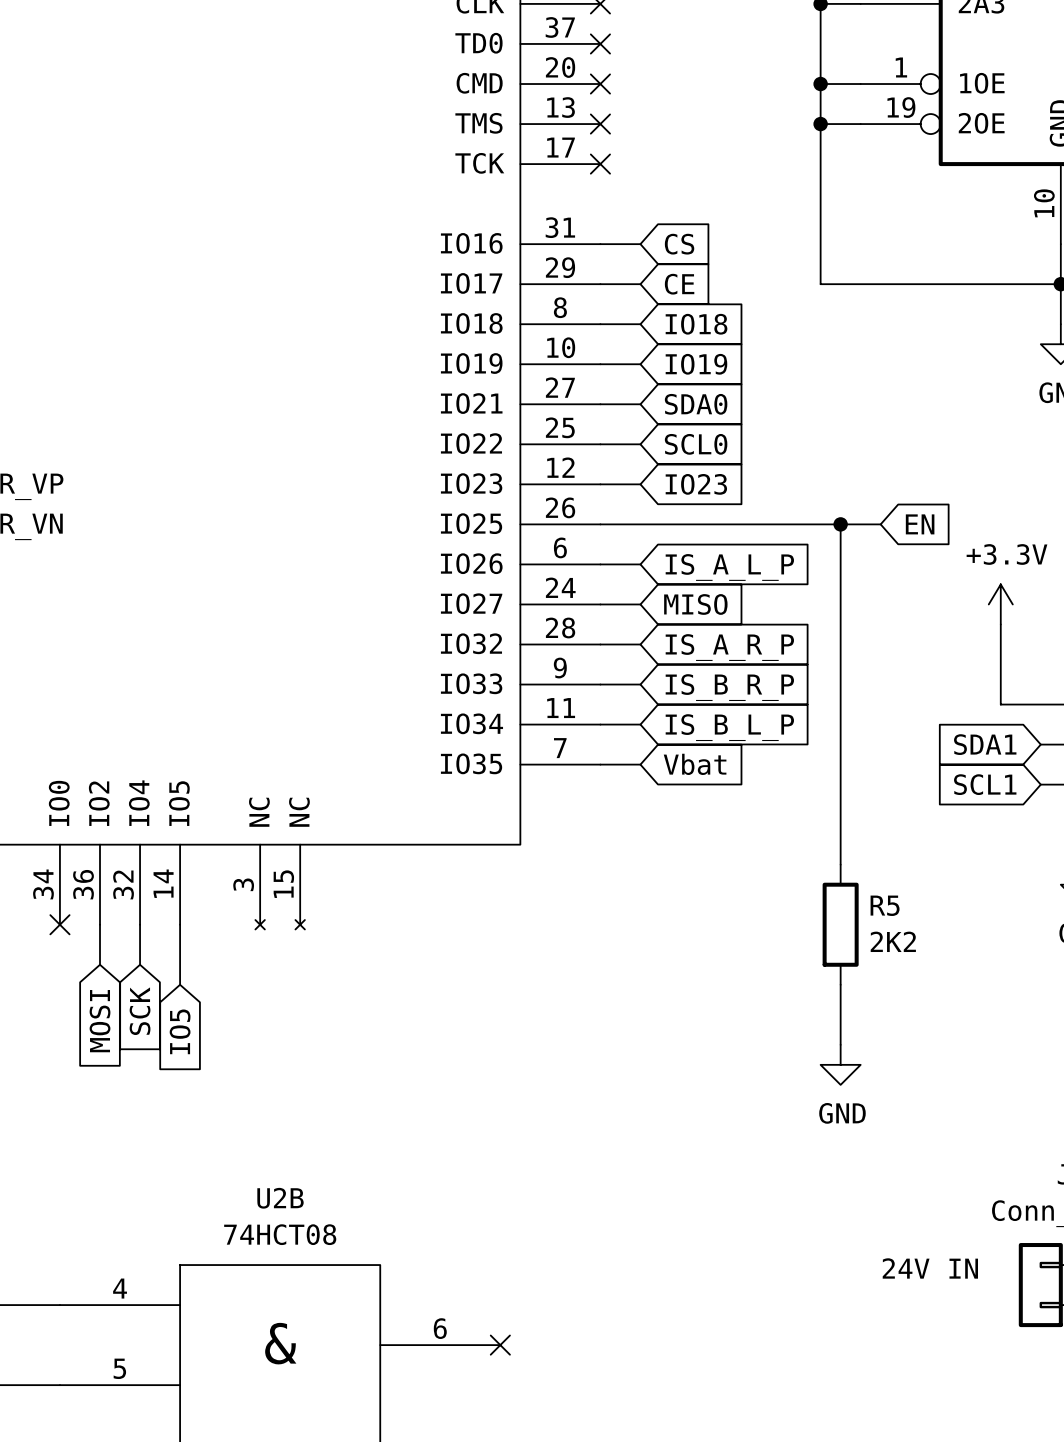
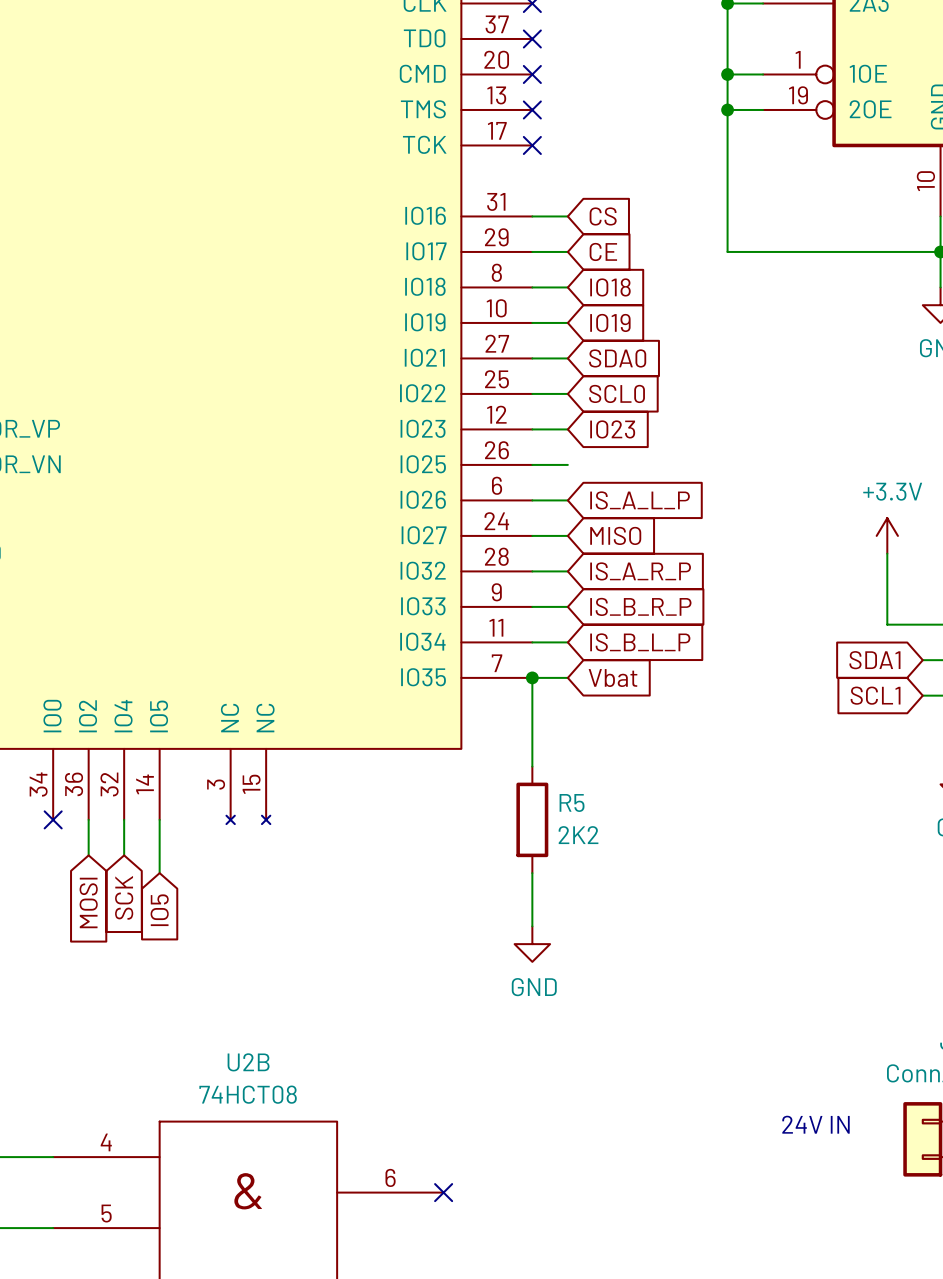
wire: (640, 524) (880, 524) -> none
wire: (840, 524) (840, 864) -> none
junction: (840, 524) -> none
global label: EN (920, 524) -> none
wire: none -> (532, 677) (532, 766)
junction: none -> (532, 677)
R5 position: (840, 924) -> (532, 819)
wire: (840, 984) (840, 1044) -> (532, 873) (532, 926)
power symbol position: GND (840, 1064) -> GND (532, 944)

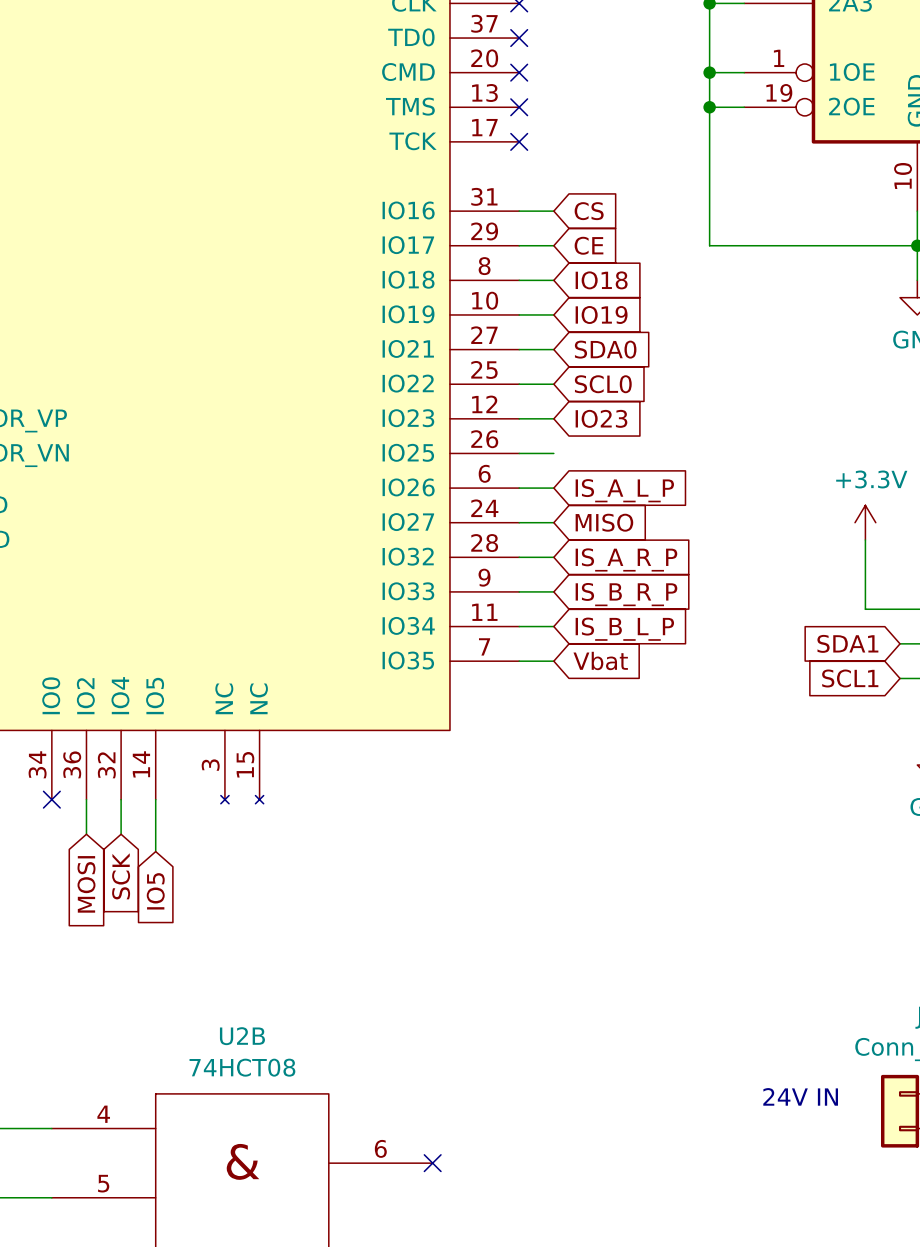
wire: (532, 677) (532, 766) -> none
junction: (532, 677) -> none
R5: 2K2 (532, 819) -> none
wire: (532, 873) (532, 926) -> none
power symbol: GND (532, 944) -> none

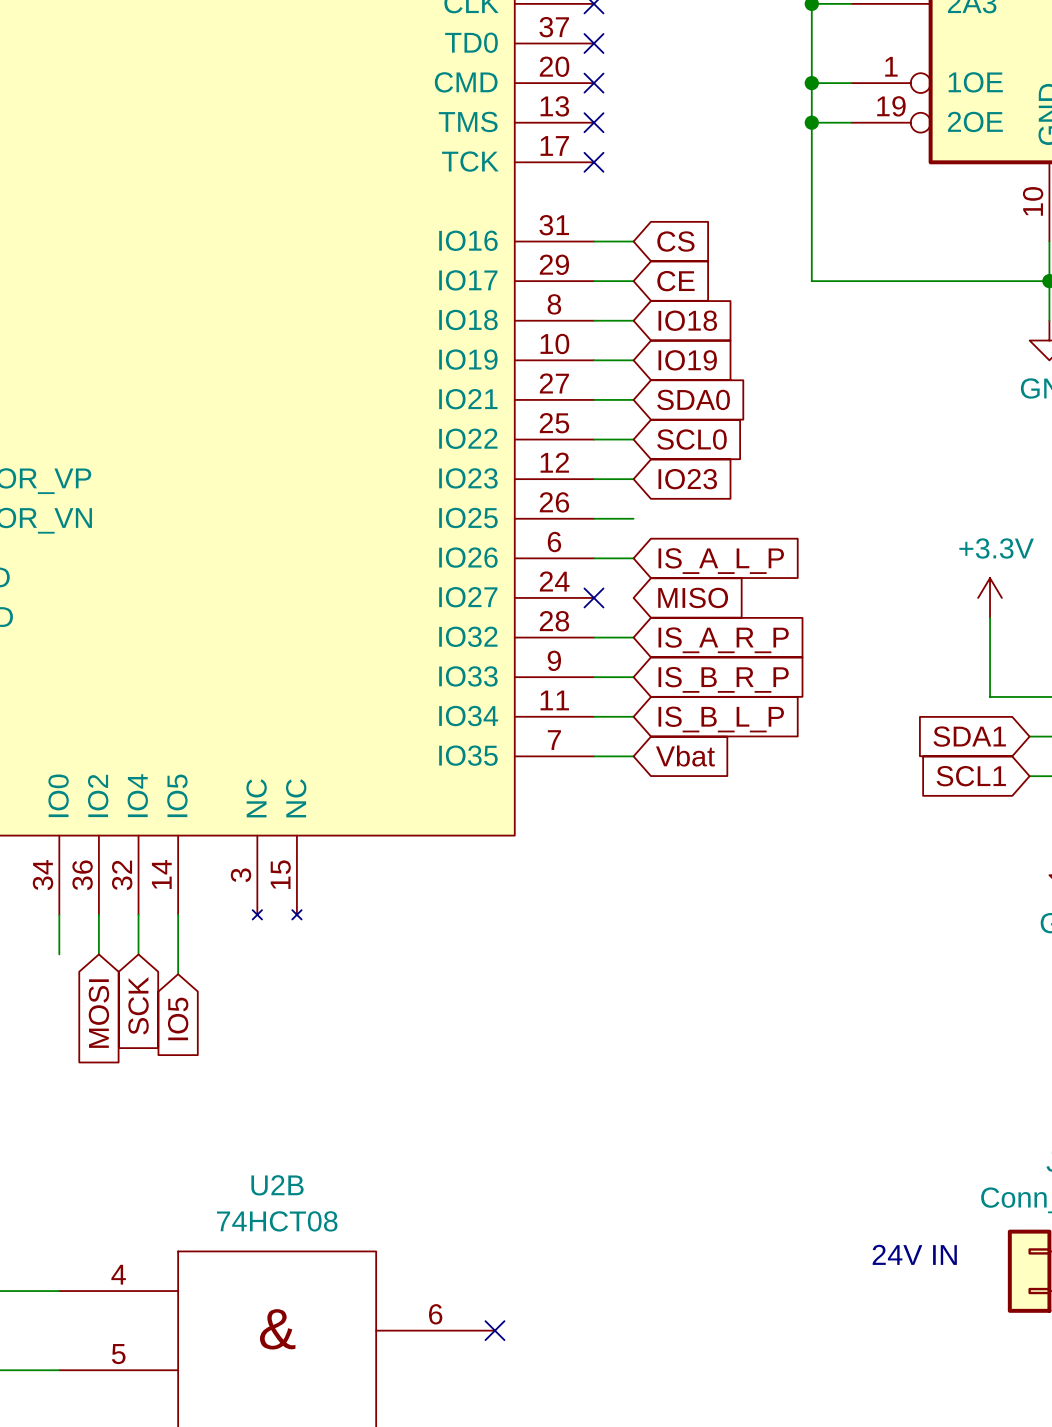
wire: (519, 522) (553, 522) -> none
no-connect mark: none -> (593, 597)
wire: none -> (59, 914) (59, 954)
no-connect mark: (51, 799) -> none

